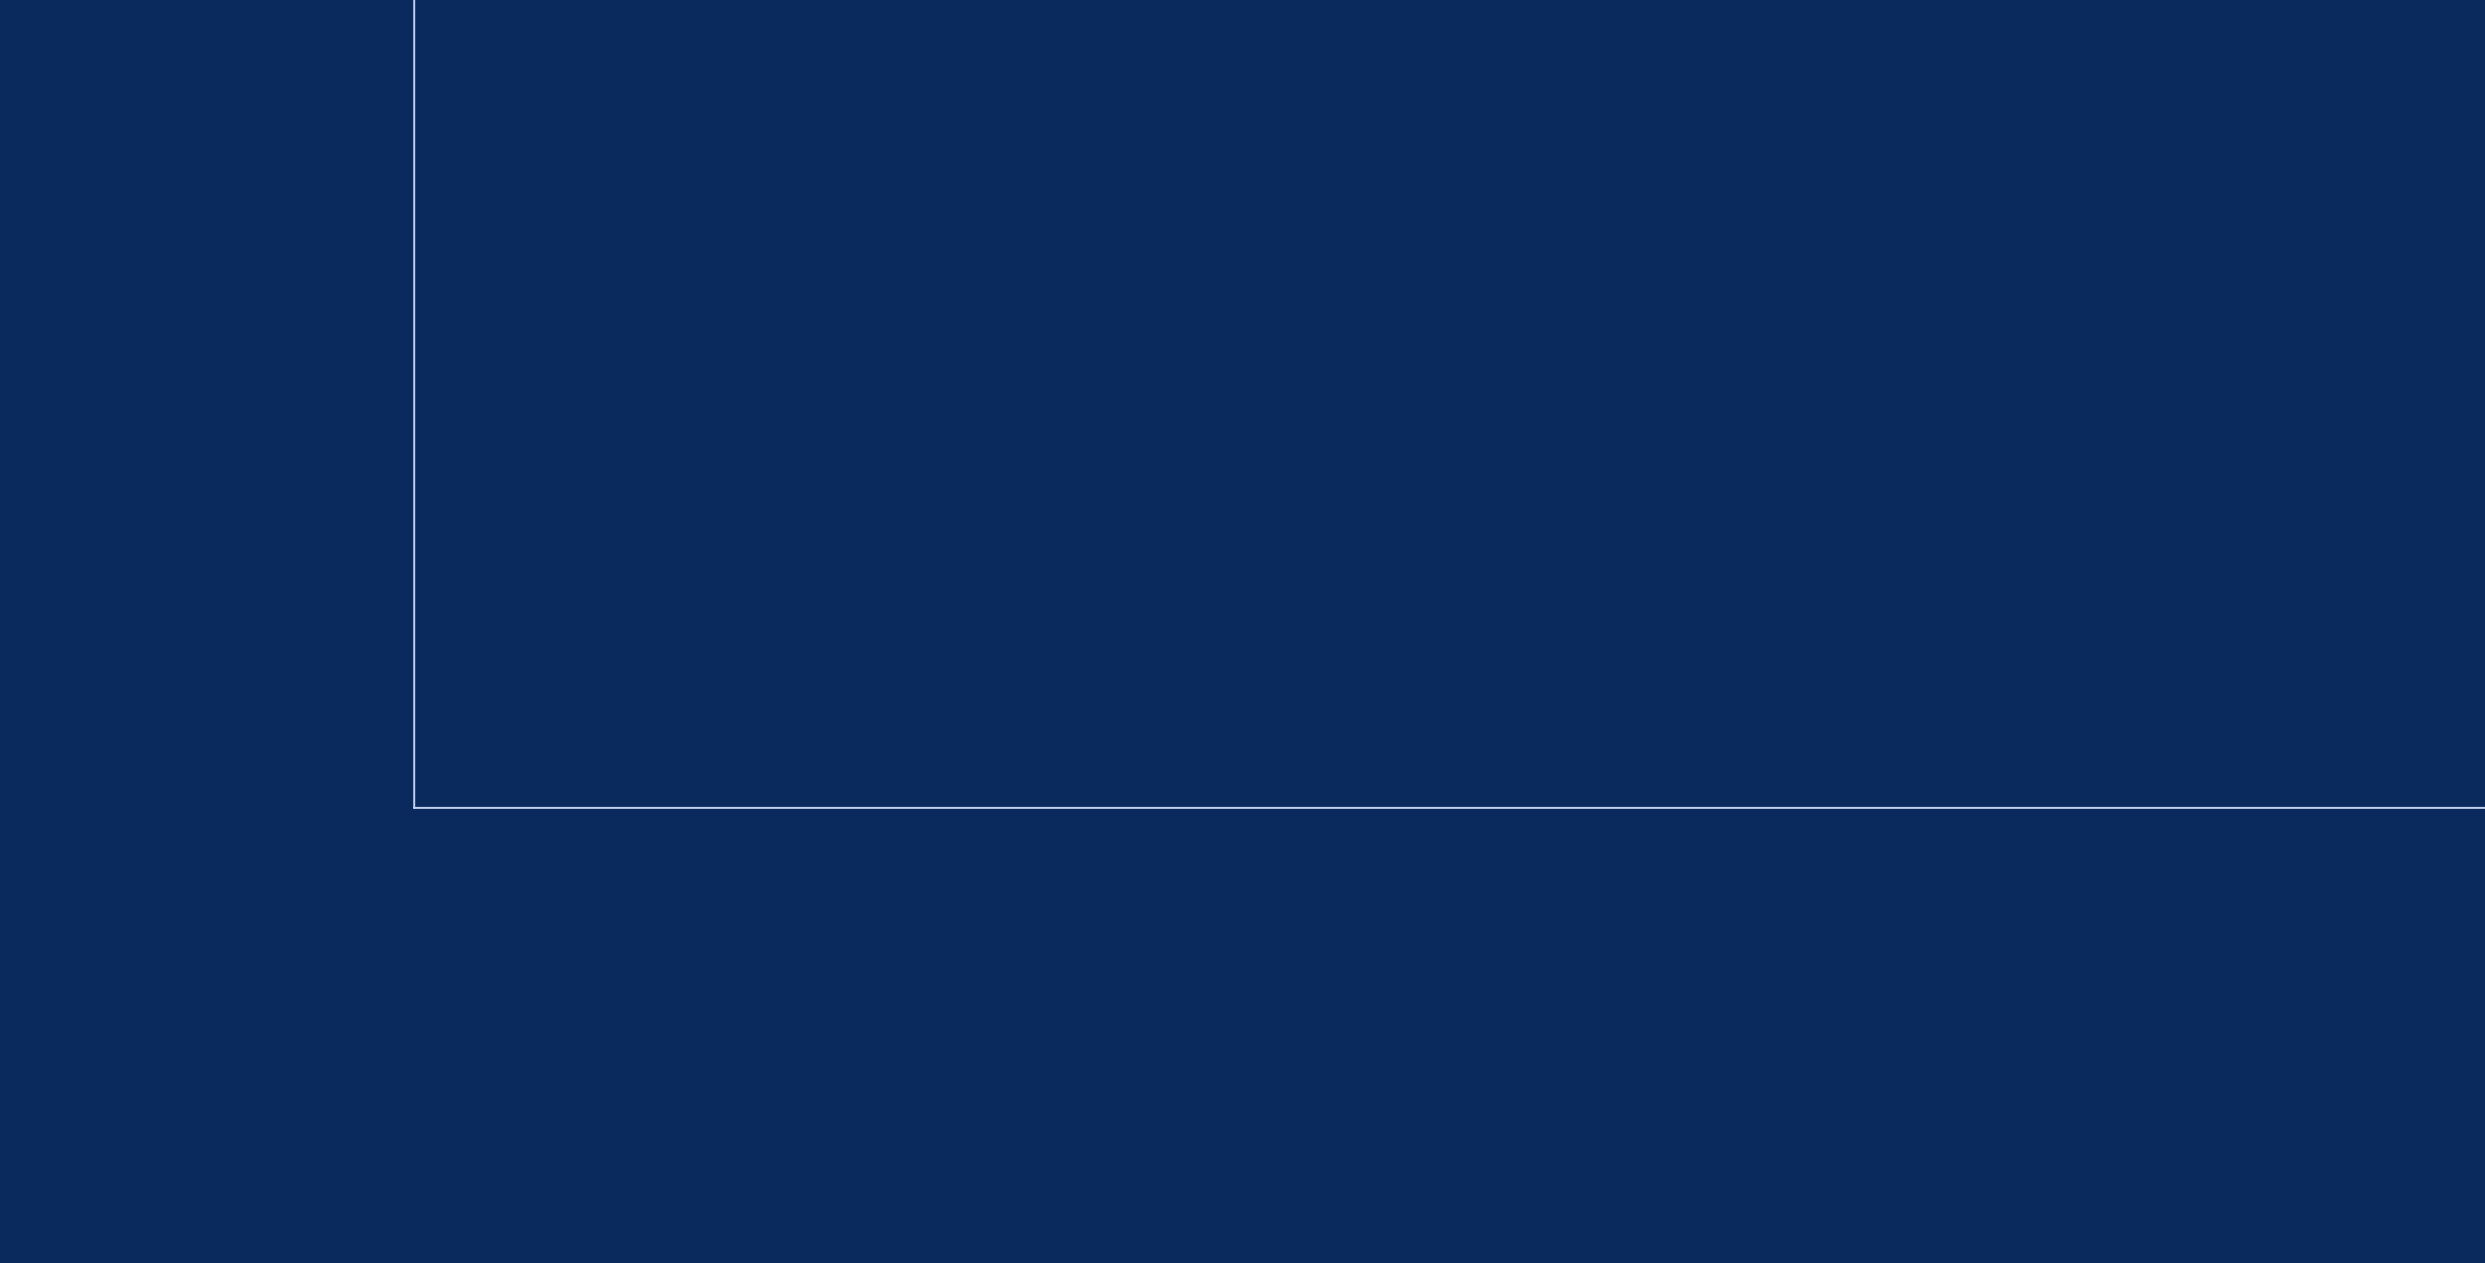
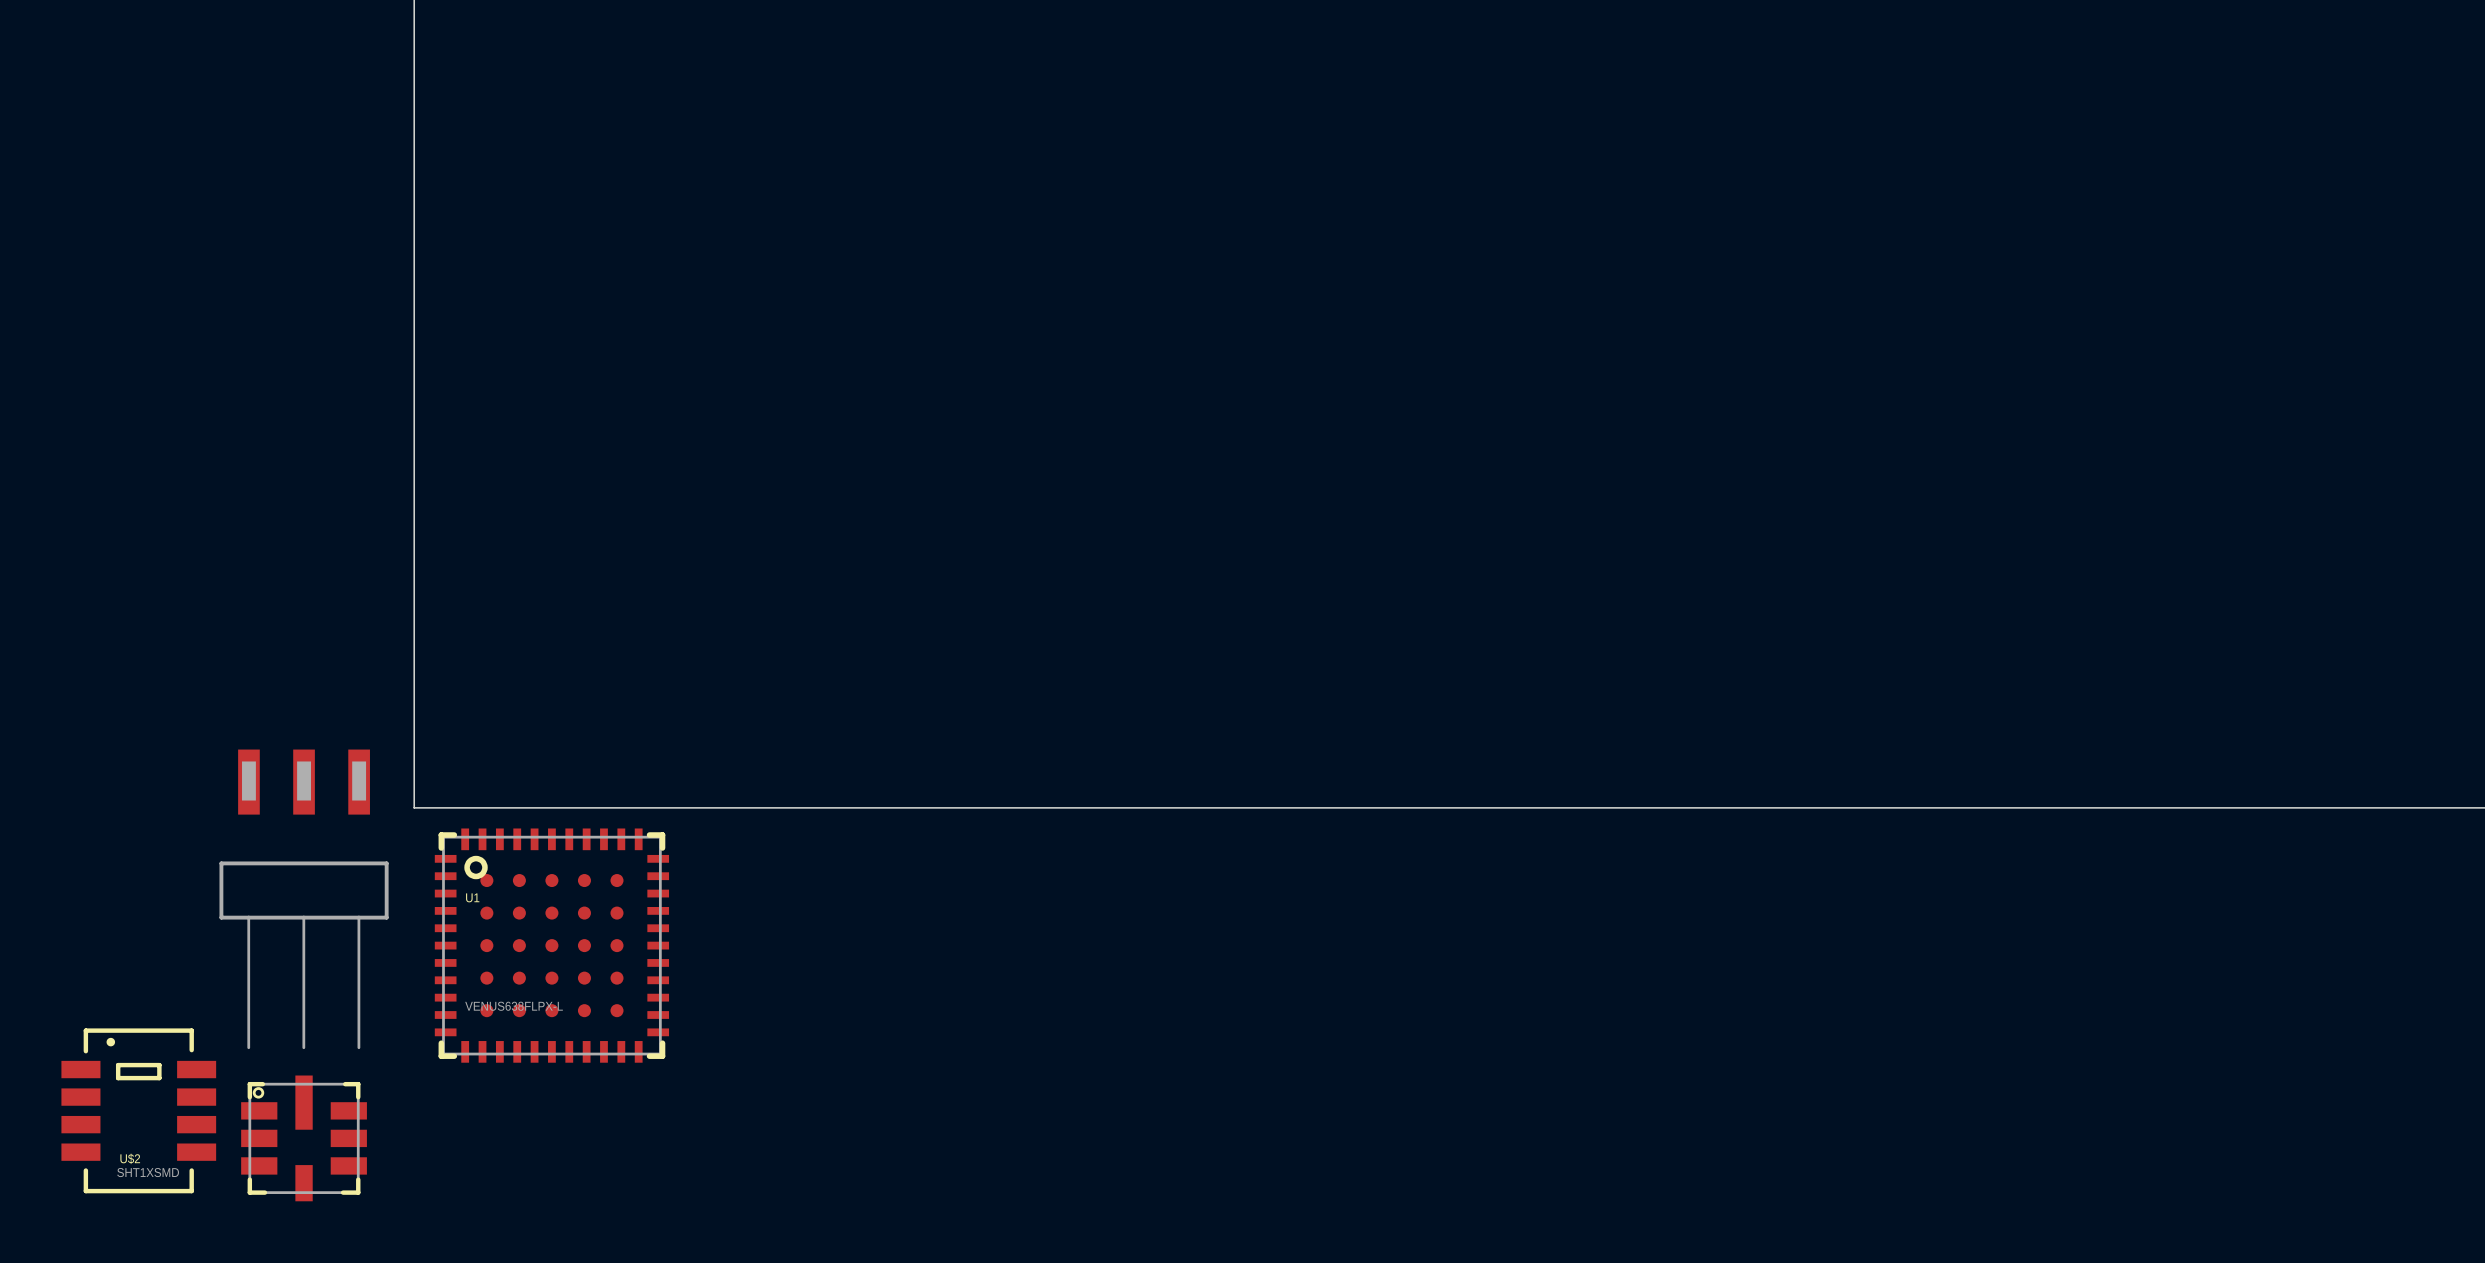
part: none -> (304, 899)
U1: none -> VENUS638FLPX-L (551, 945)
U$2: none -> SHT1XSMD (138, 1110)
part: none -> (304, 1138)

